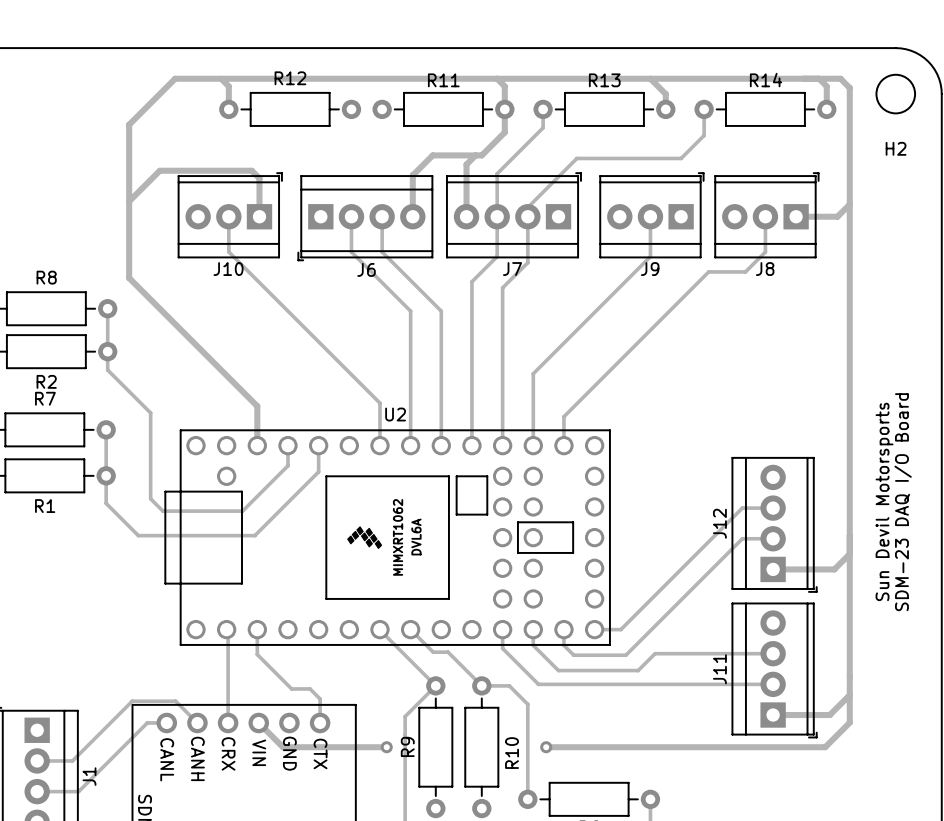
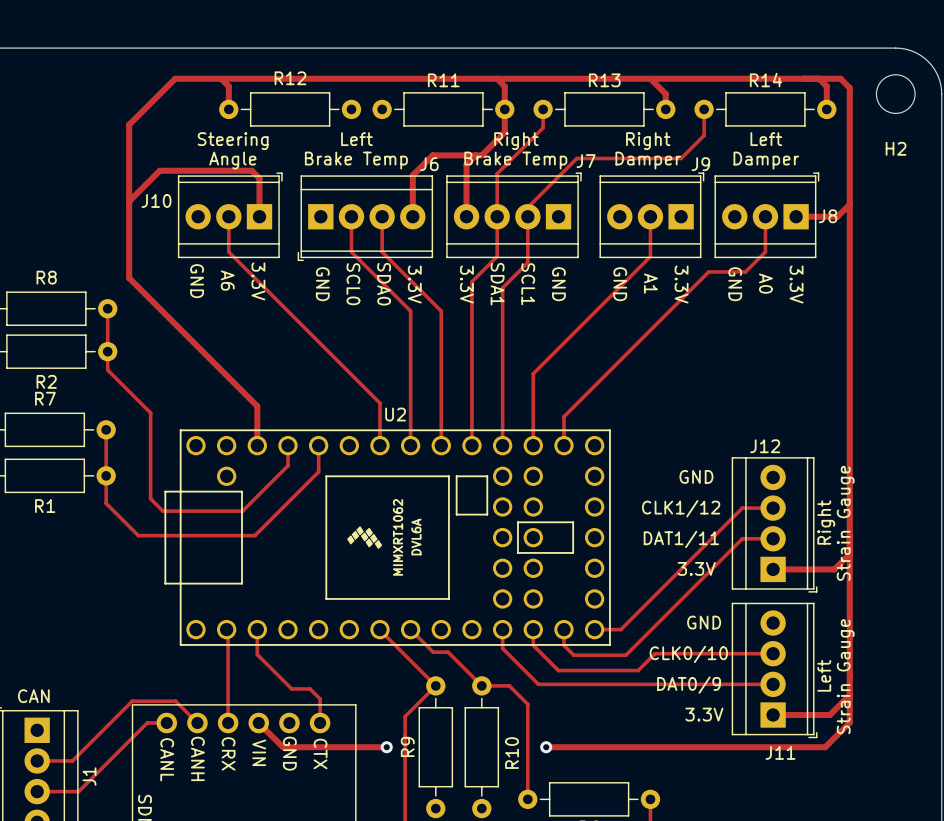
text: none -> Left (356, 139)
text: none -> Left (766, 139)
text: none -> Steering (233, 141)
text: none -> Right (516, 141)
text: none -> Right (648, 141)
text: none -> Angle (232, 160)
text: none -> Brake Temp (356, 160)
text: none -> Brake Temp (515, 160)
text: none -> Damper (648, 160)
text: none -> Damper (766, 160)
J10 name position: J10 (228, 269) -> J10 (156, 200)
J6 name position: J6 (366, 269) -> J6 (429, 164)
J7 name position: J7 (512, 269) -> J7 (586, 161)
J9 name position: J9 (650, 269) -> J9 (700, 164)
J8 name position: J8 (765, 269) -> J8 (828, 216)
text: none -> A6 (227, 280)
text: none -> GND (197, 281)
text: none -> 3.3V (258, 281)
text: none -> A1 (650, 283)
text: none -> A0 (765, 283)
text: none -> GND (322, 284)
text: none -> SCL0 (353, 284)
text: none -> SDA0 (384, 284)
text: none -> 3.3V (414, 284)
text: none -> 3.3V (466, 284)
text: none -> SDA1 (497, 284)
text: none -> SCL1 (528, 284)
text: none -> GND (558, 284)
text: none -> GND (620, 284)
text: none -> 3.3V (681, 284)
text: none -> GND (735, 284)
text: none -> 3.3V (796, 284)
text: none -> GND (696, 476)
text: Sun Devil Motorsports (884, 501) -> none
text: SDM-23 DAQ I/O Board (903, 502) -> none
text: none -> CLK1/12 (681, 508)
text: none -> Right (826, 522)
J12 name rotation: 0° (719, 523) -> 90° clockwise (765, 446)
J12 name position: J12 (719, 523) -> J12 (765, 446)
text: none -> Strain Gauge (845, 523)
text: none -> DAT1/11 (681, 539)
text: none -> 3.3V (696, 568)
text: none -> GND (704, 622)
text: none -> CLK0/10 (688, 654)
J11 name rotation: 0° (719, 669) -> 90° clockwise (780, 752)
J11 name position: J11 (719, 669) -> J11 (780, 752)
text: none -> Left (824, 675)
text: none -> Strain Gauge (845, 676)
text: none -> DAT0/9 (689, 685)
text: none -> CAN (33, 696)
text: none -> 3.3V (704, 714)

